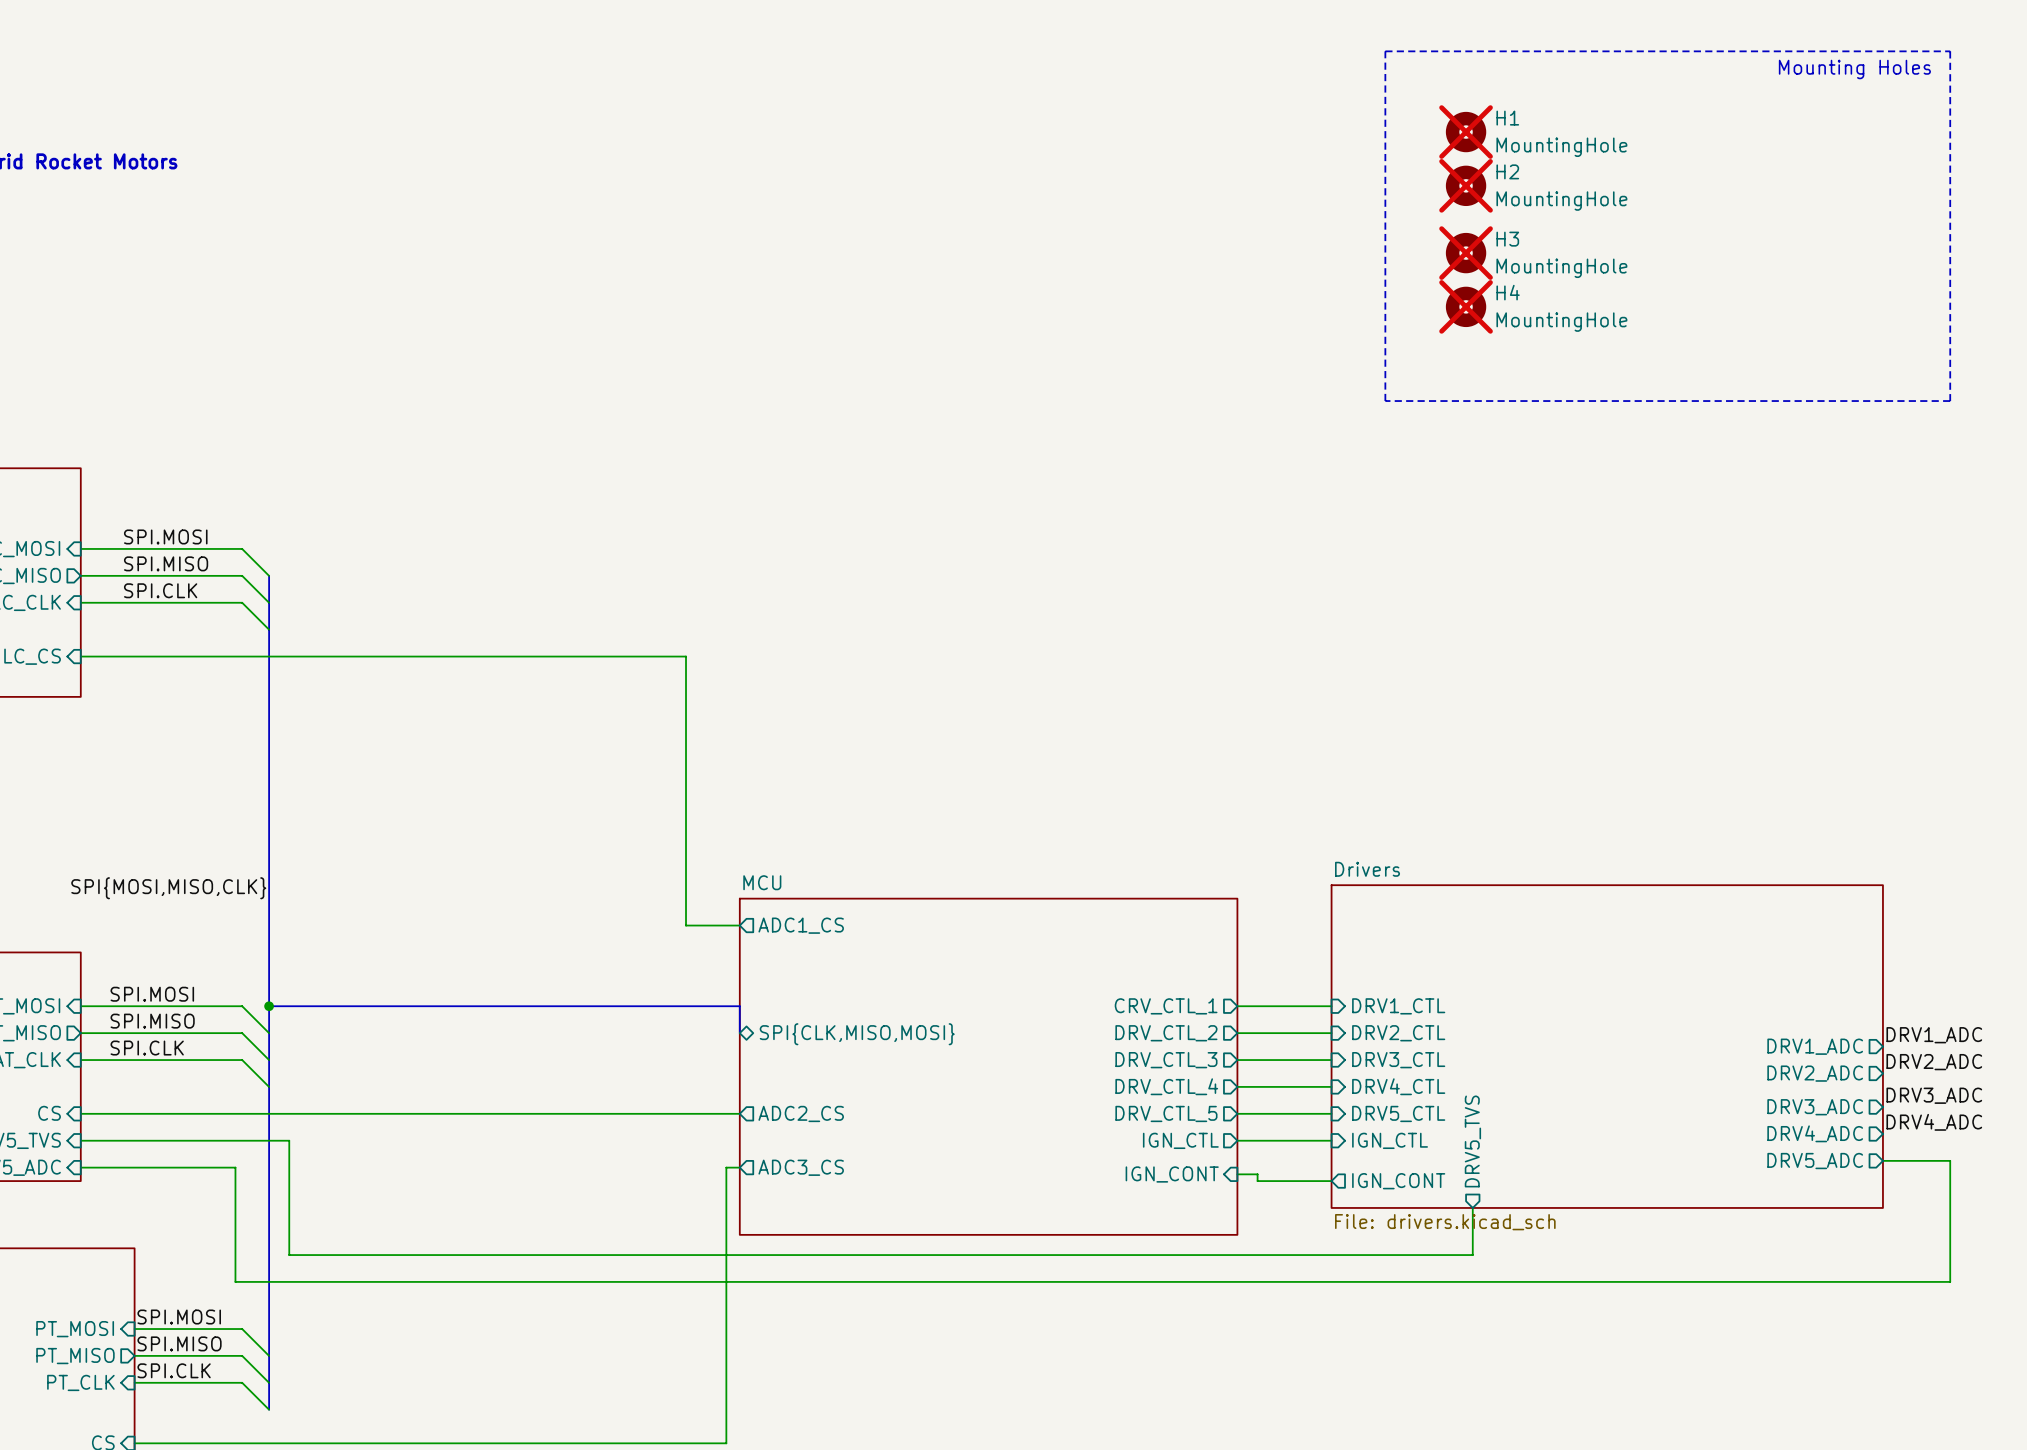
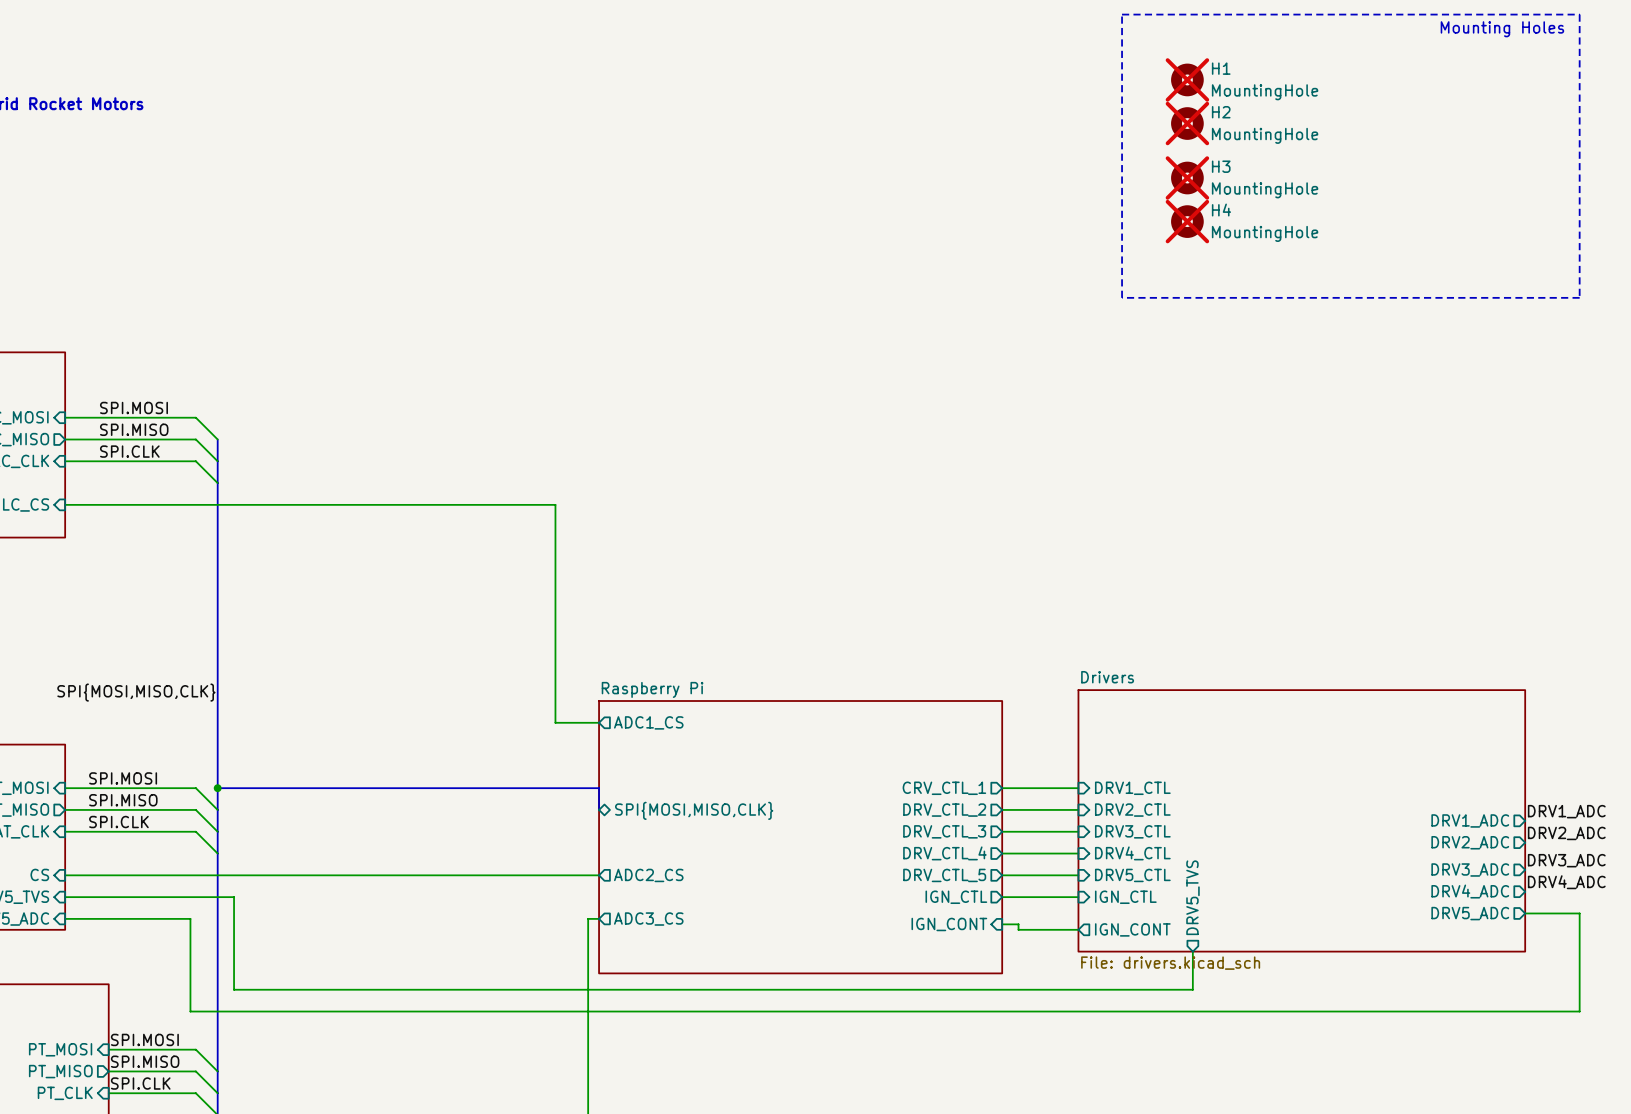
sheet MCU name: MCU (762, 882) -> Raspberry Pi (652, 689)
sheet pin: SPI{CLK,MISO,MOSI} (857, 1034) -> SPI{MOSI,MISO,CLK} (694, 810)

